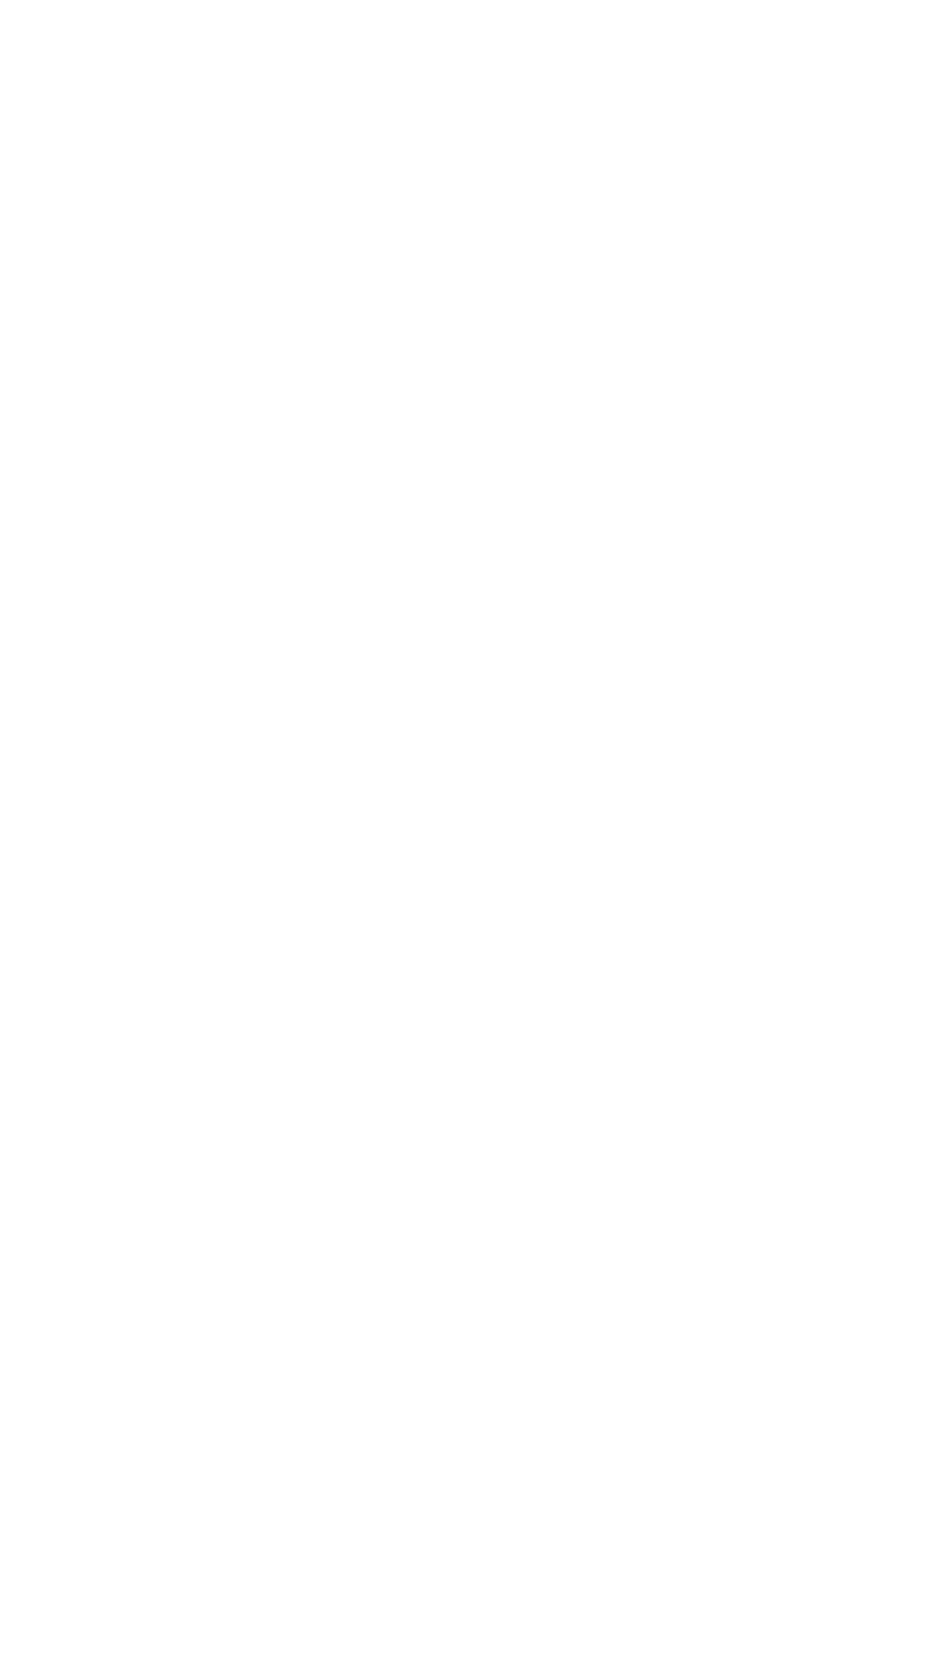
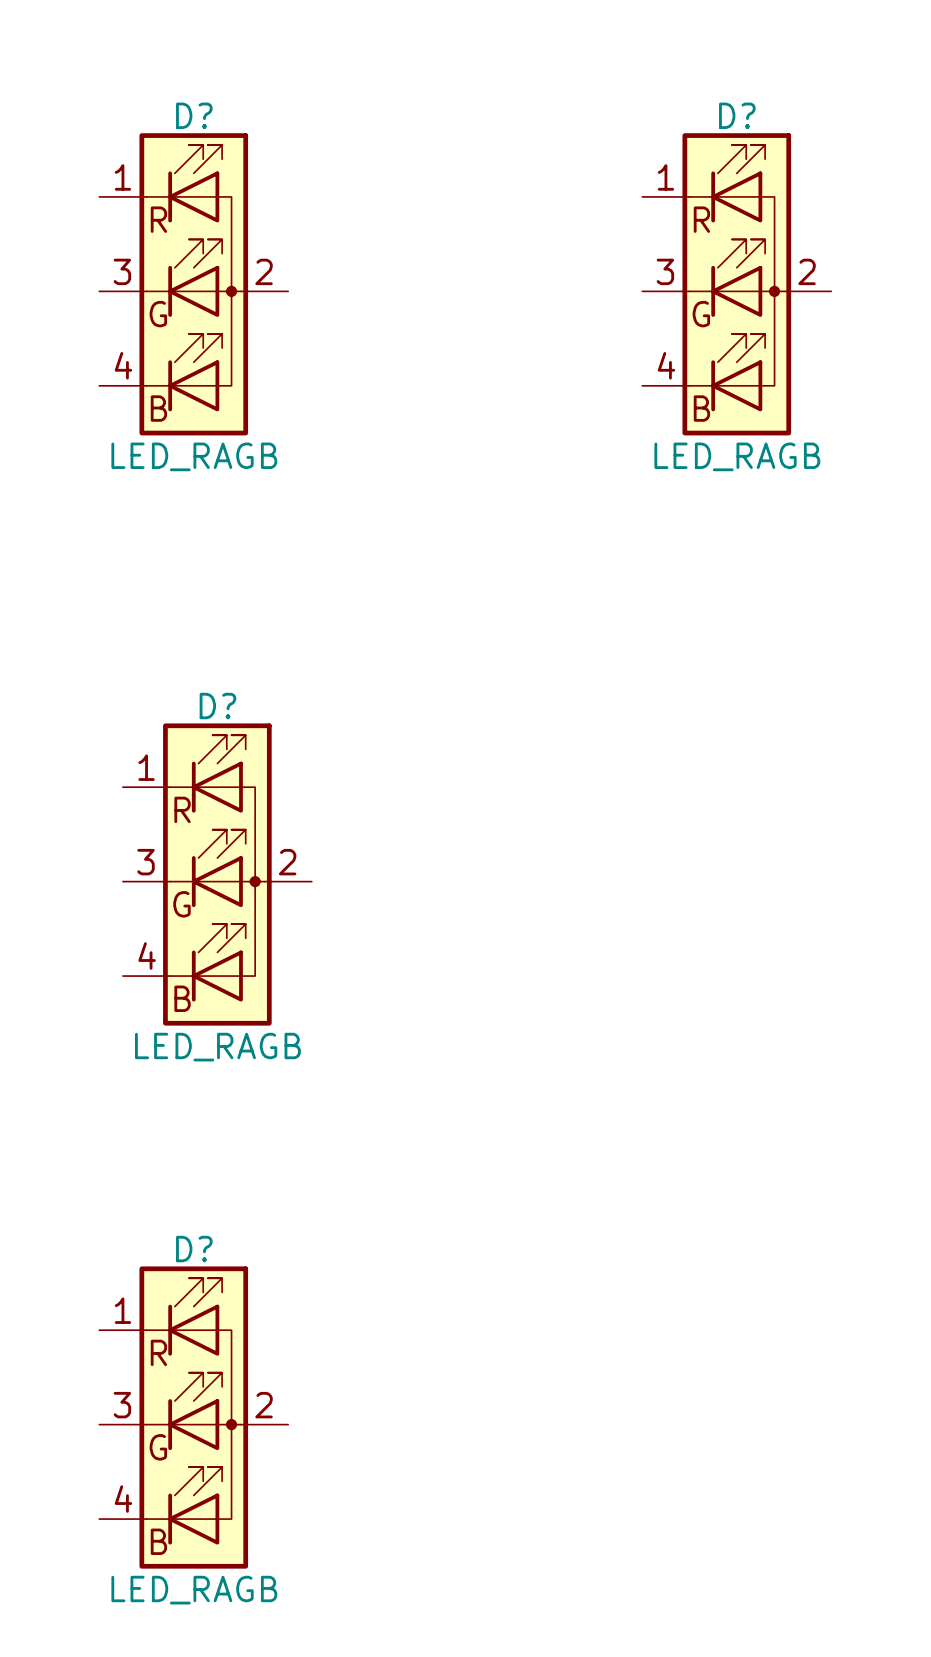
D?: none -> LED_RAGB (193, 284)
D?: none -> LED_RAGB (736, 284)
D?: none -> LED_RAGB (217, 874)
D?: none -> LED_RAGB (193, 1417)

